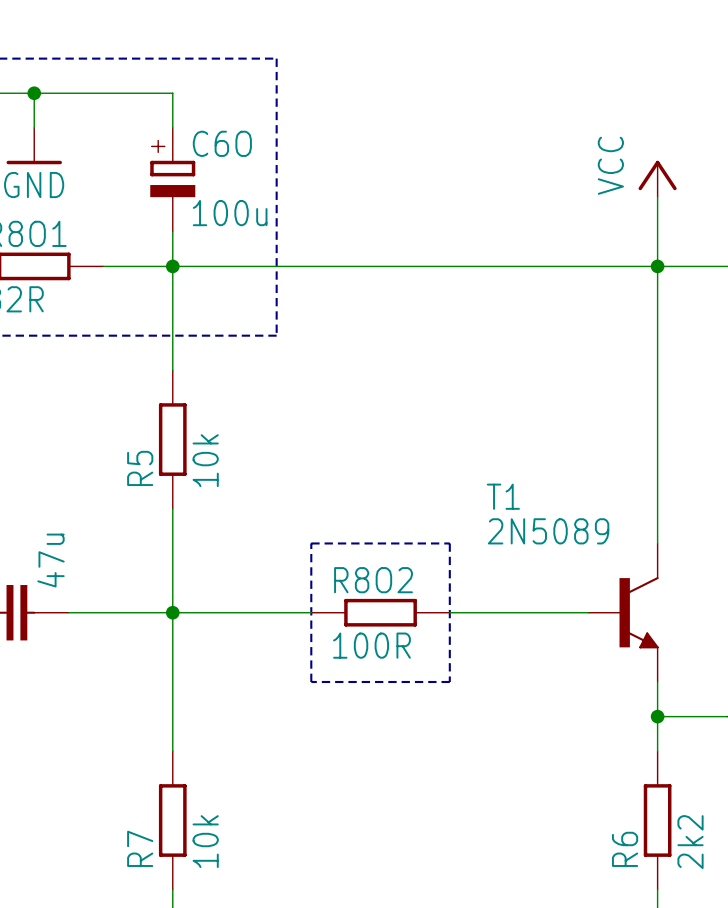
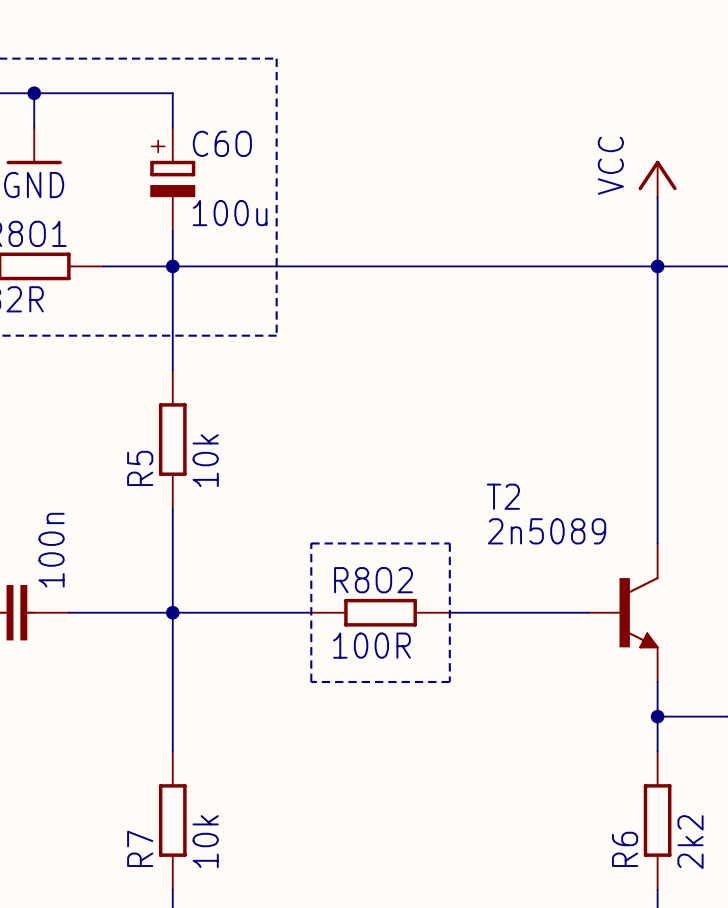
T1 name: T1 (503, 496) -> T2 (503, 496)
T1 value: 2N5089 (548, 531) -> 2n5089 (547, 531)
part value: 47u (50, 560) -> 100n (51, 550)

